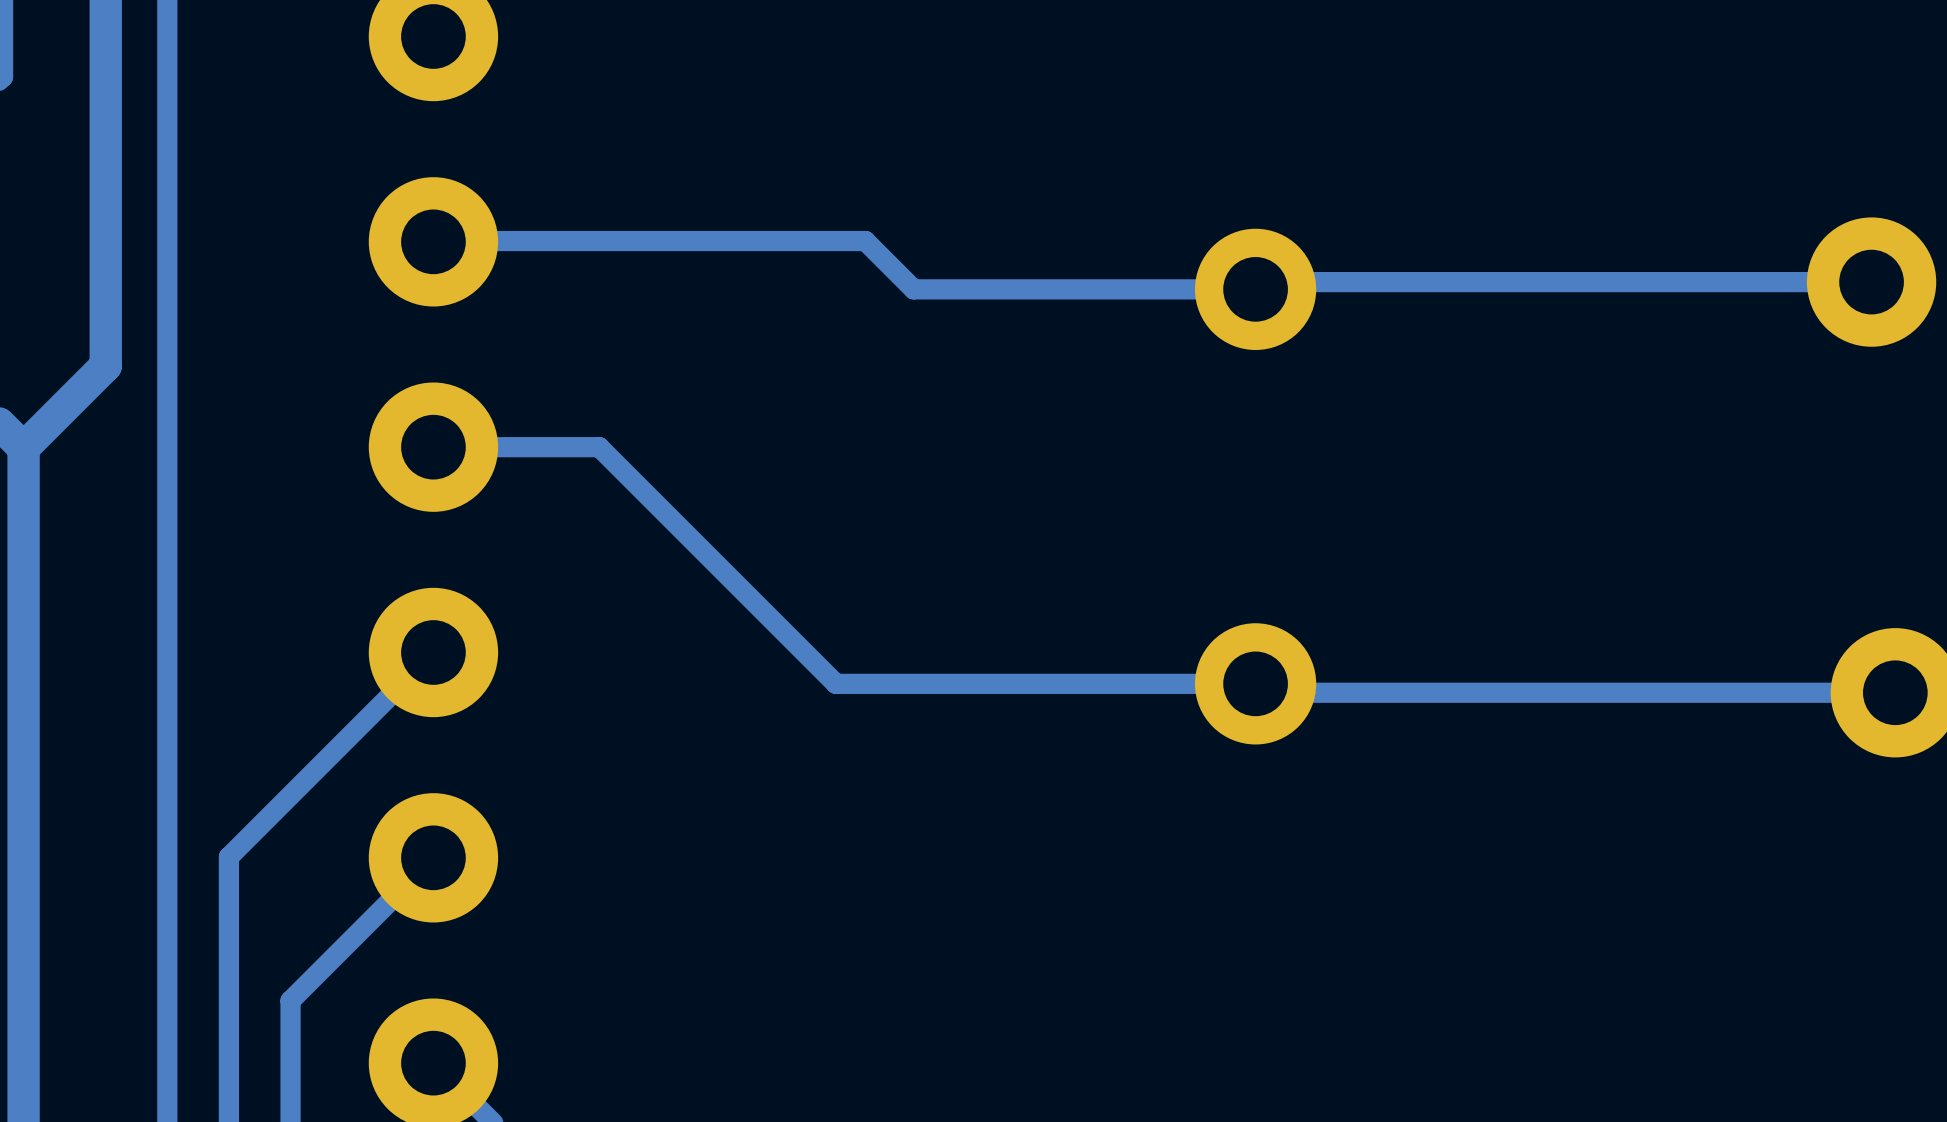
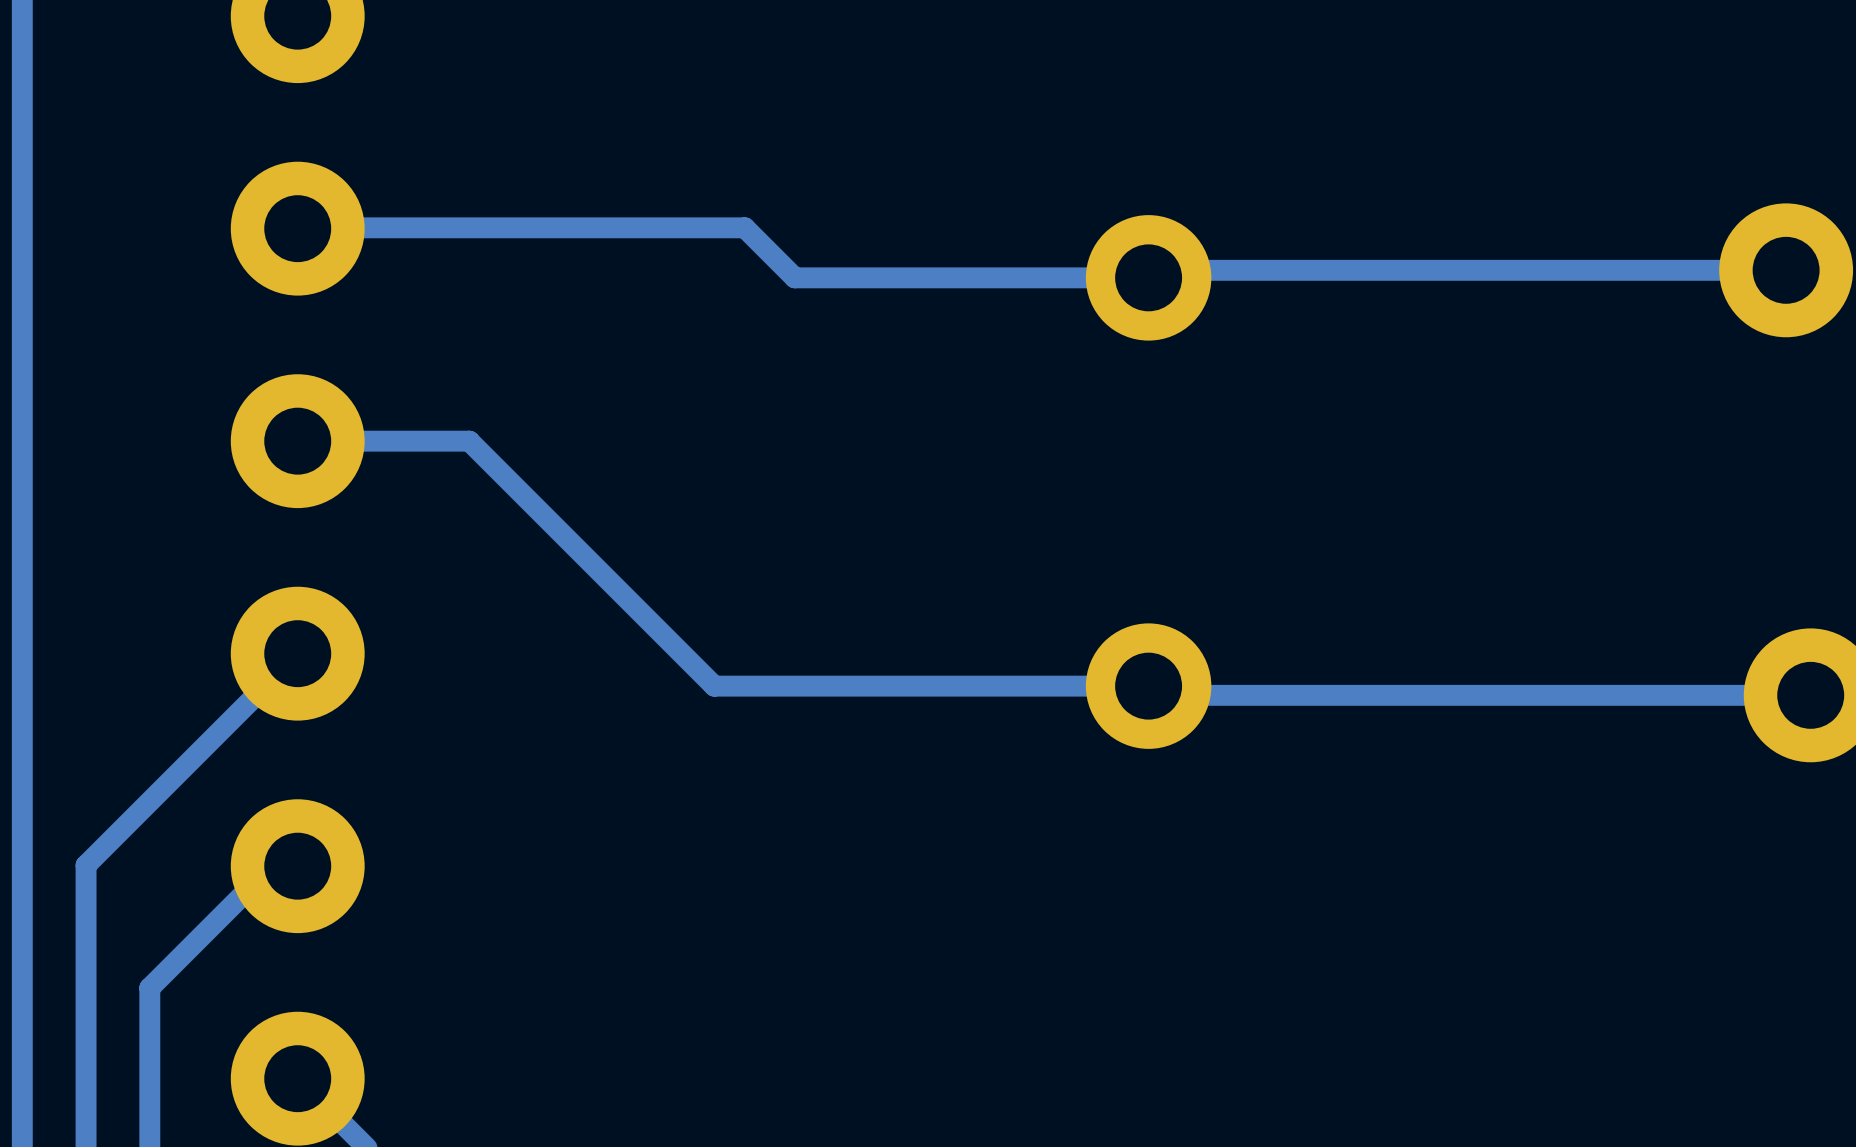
bottom track: (433, 857) (290, 1000) -> (297, 866) (271, 866) (149, 988) (149, 1014)

